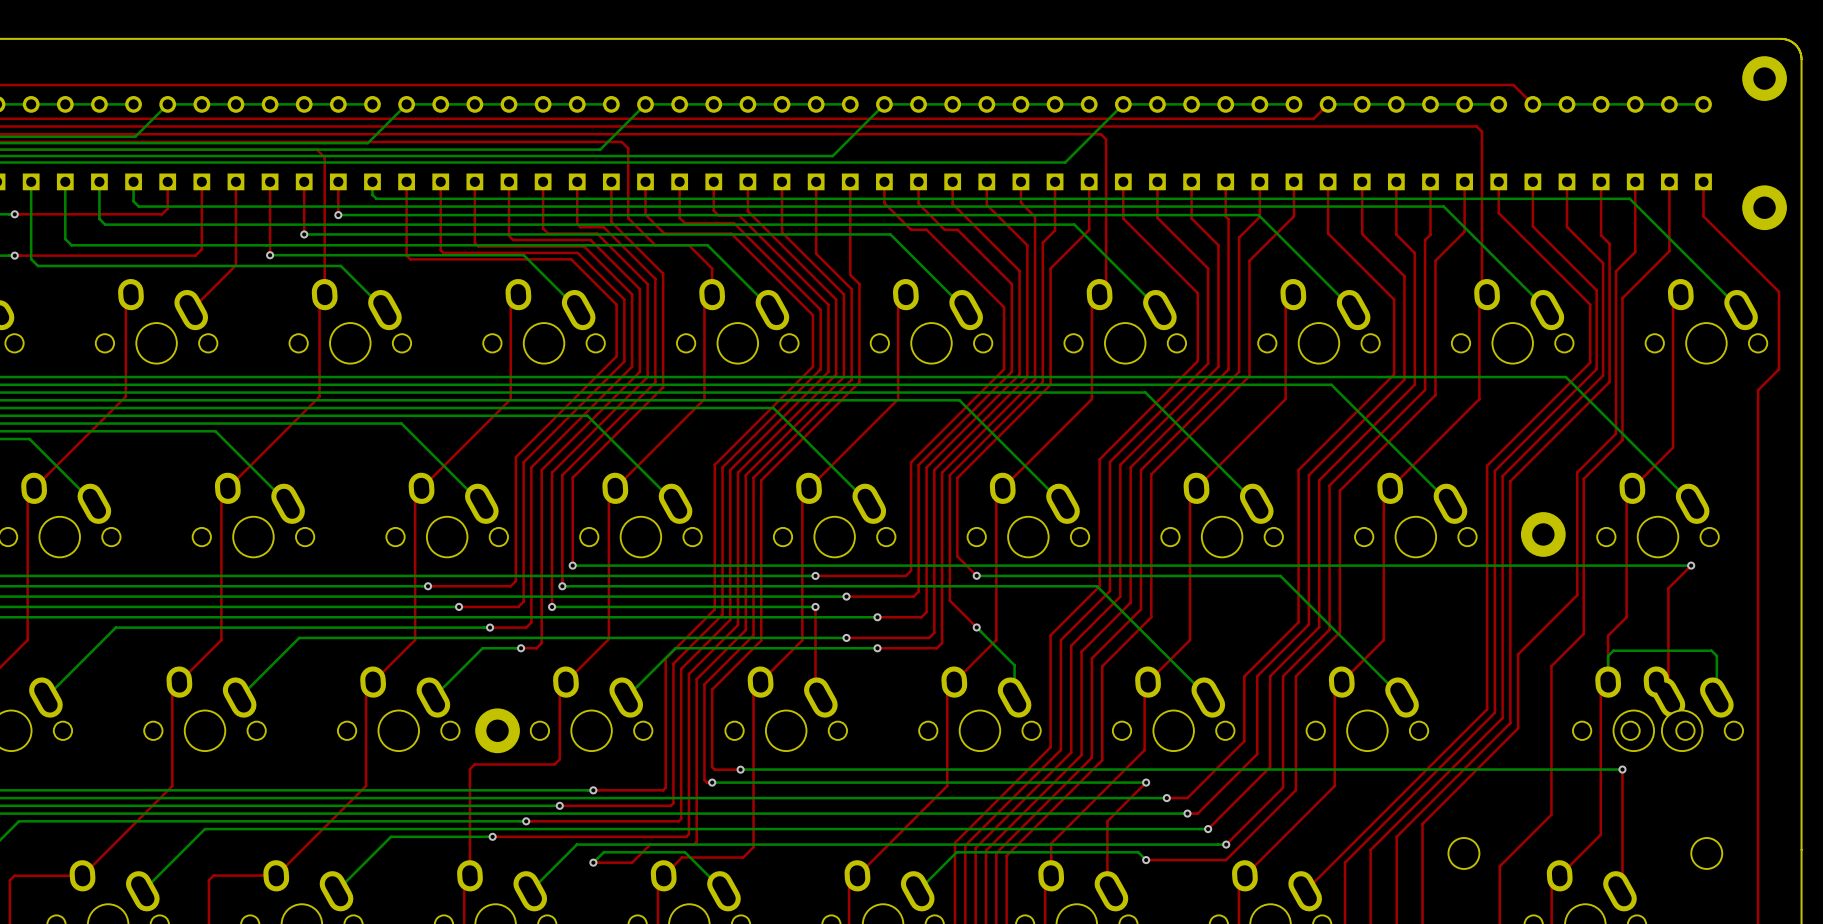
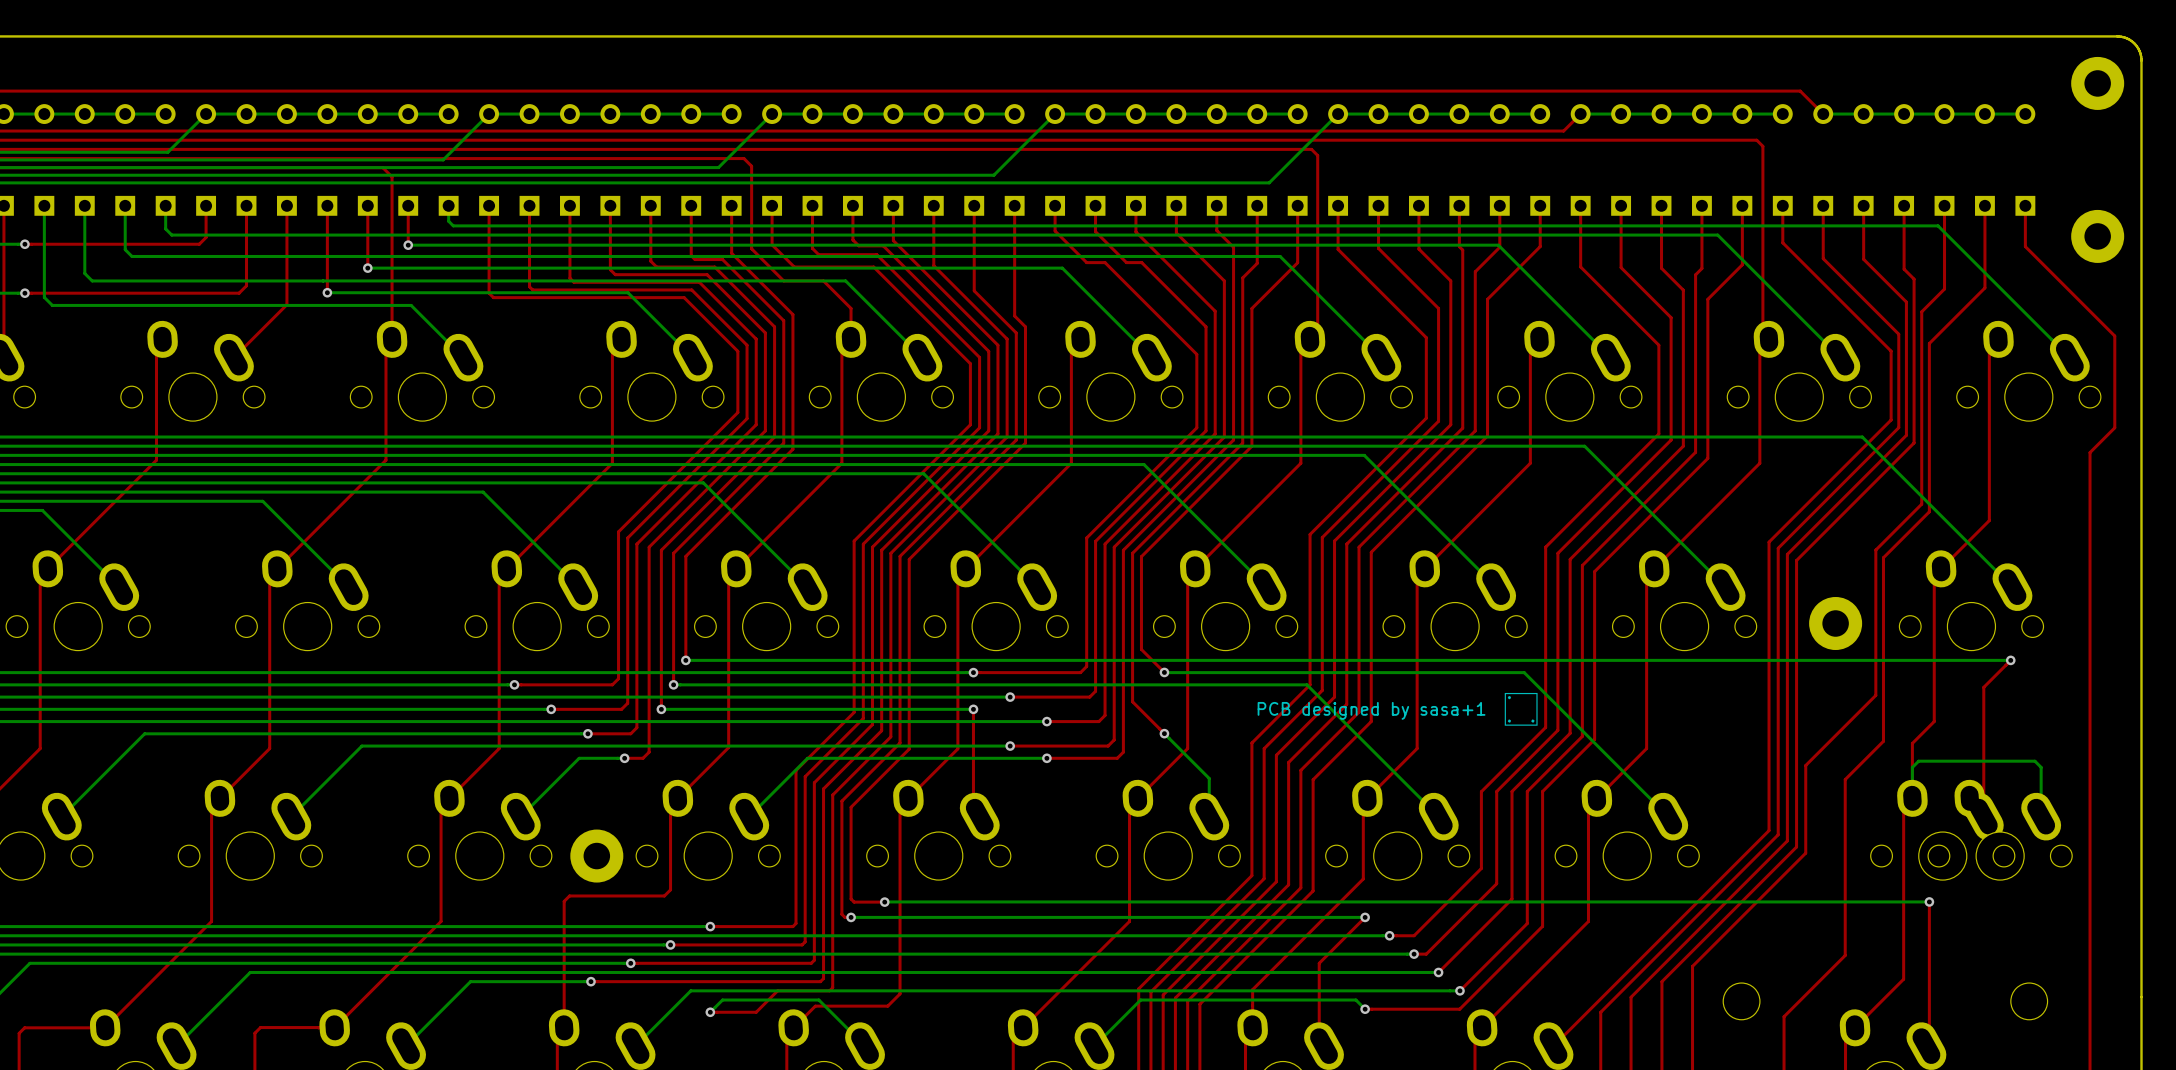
drawing: none -> [1504, 692, 1538, 726]
text: none -> PCB designed by sasa+1 (1371, 710)

